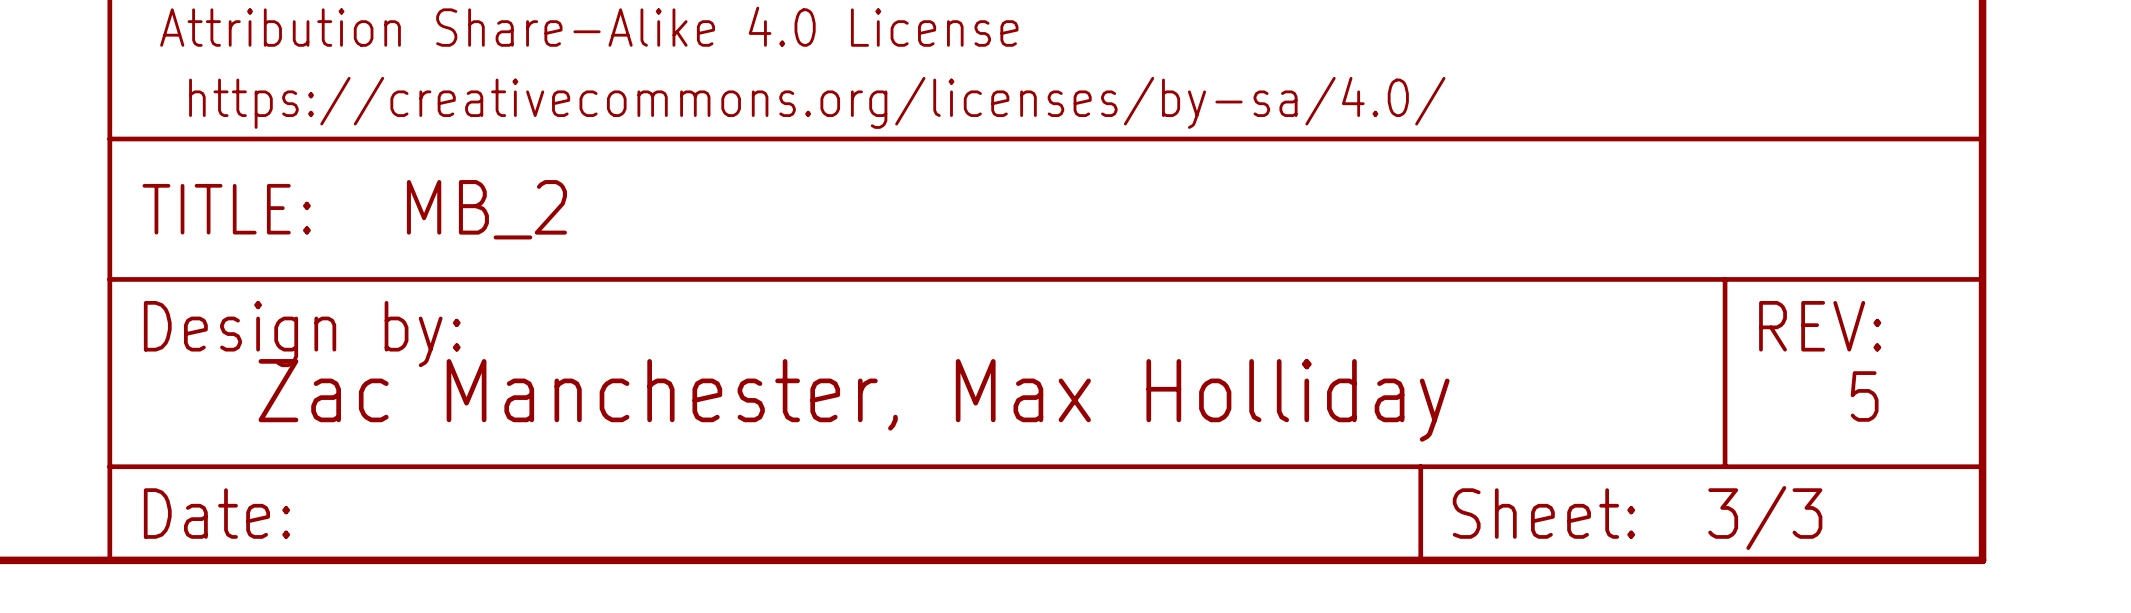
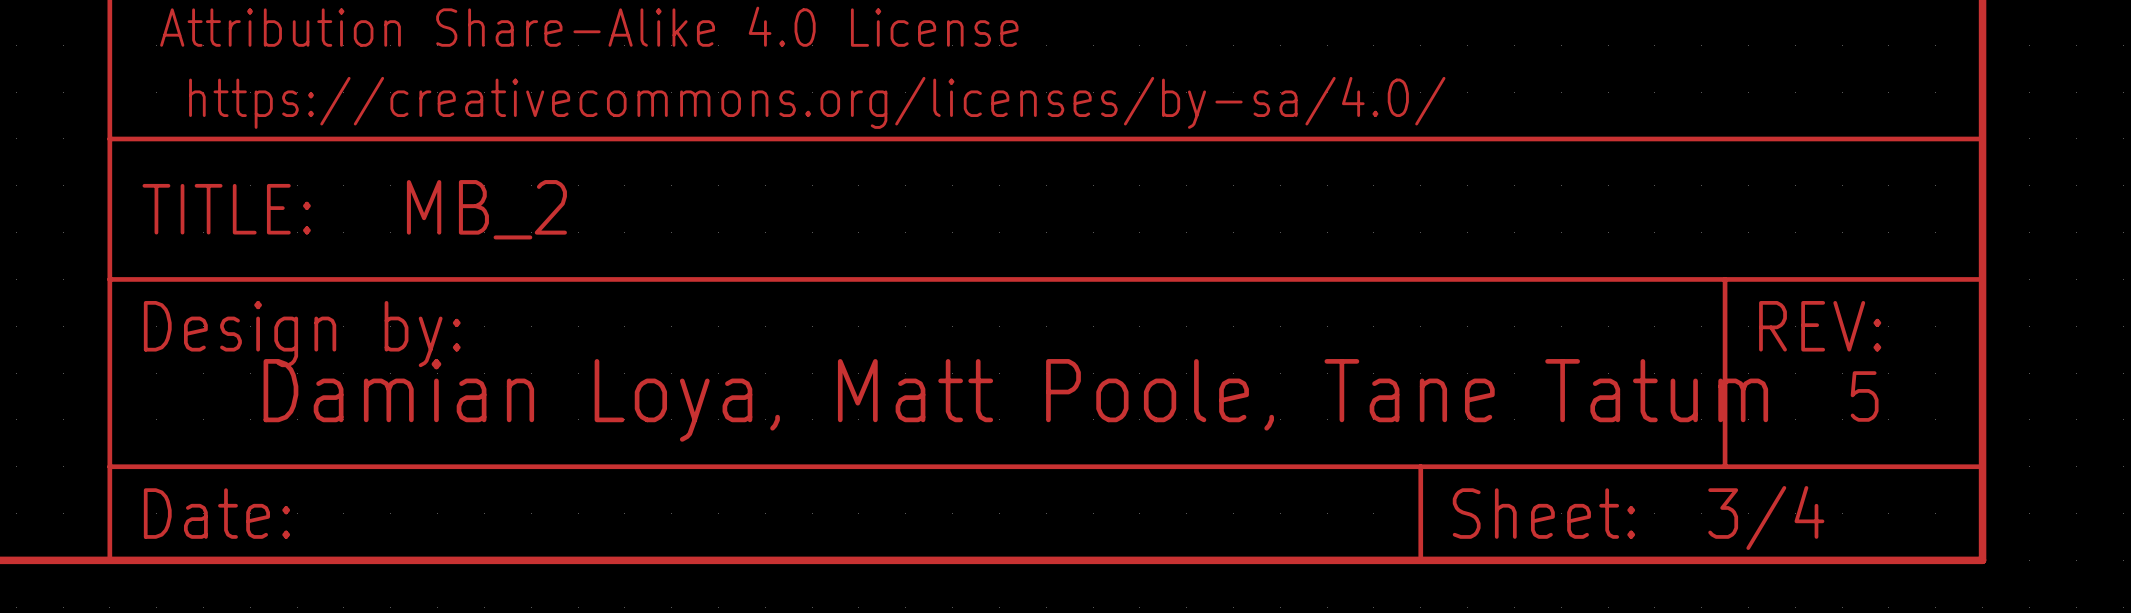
text: Zac Manchester, Max Holliday (854, 400) -> Damian Loya, Matt Poole, Tane Tatum (1015, 400)
part text: 3/3 (1765, 517) -> 3/4 (1766, 517)

